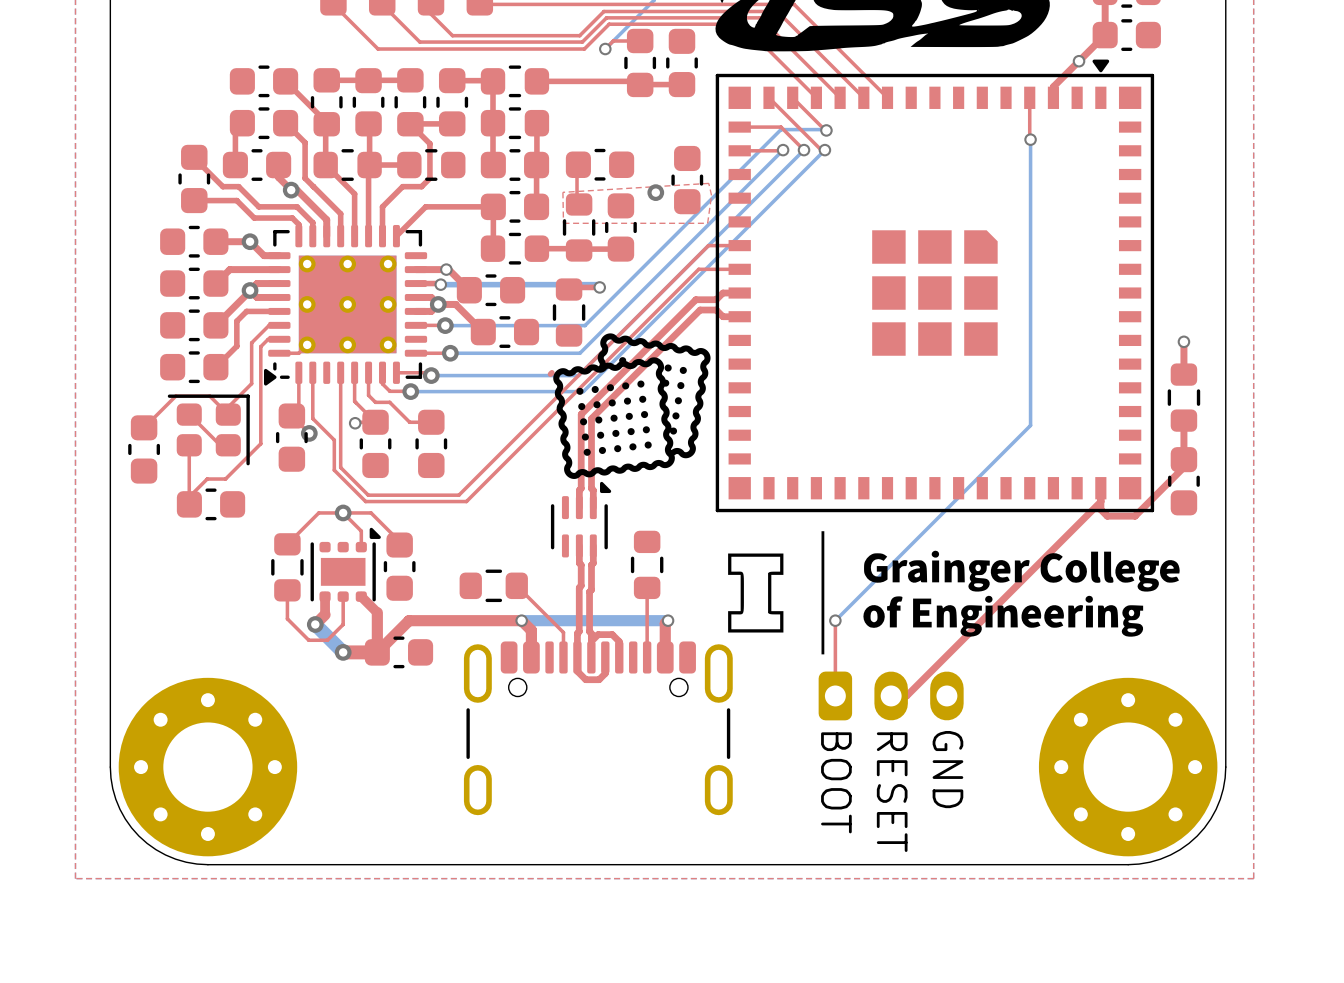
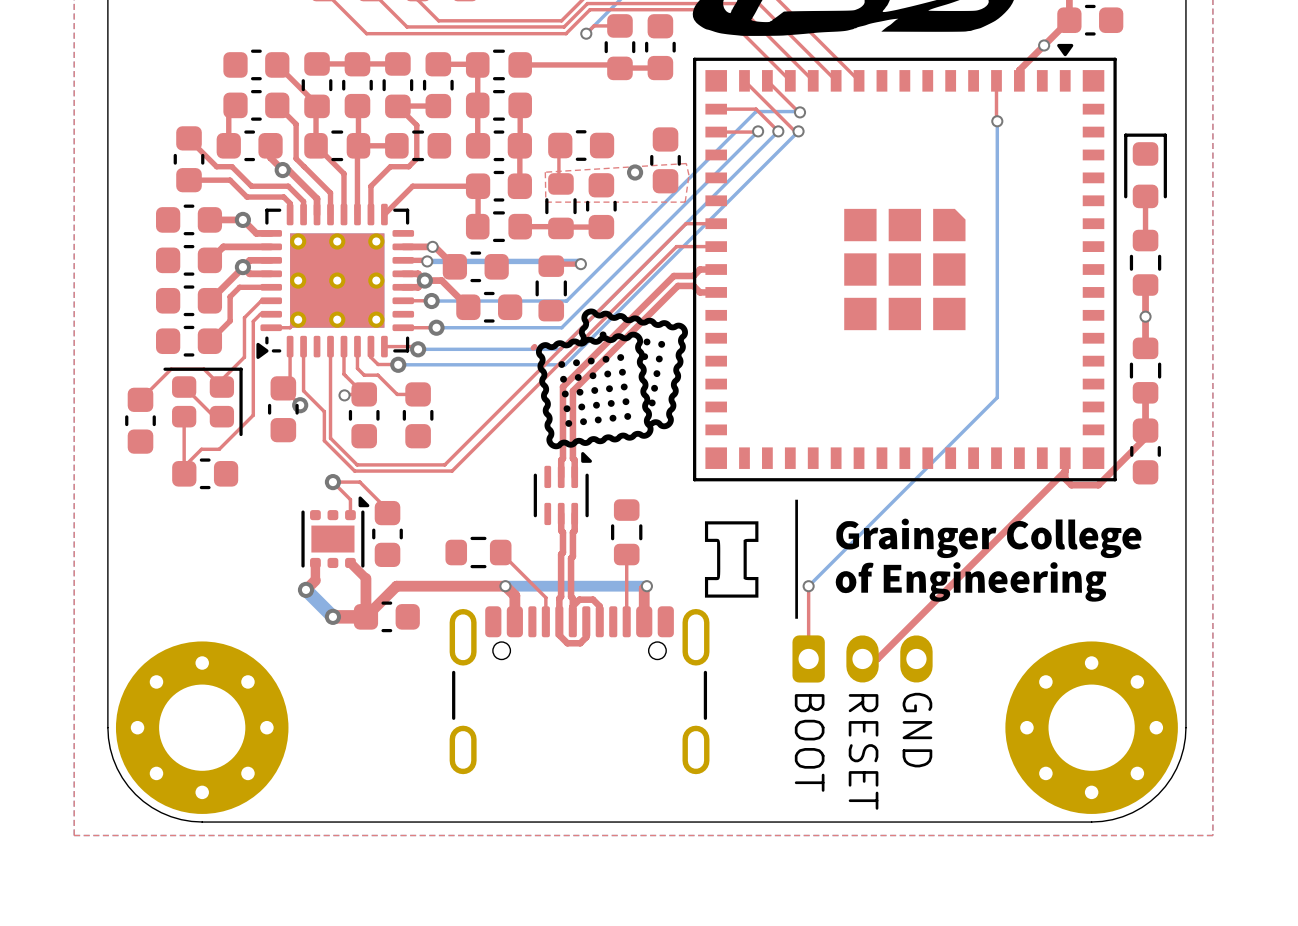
part: none -> (1145, 170)
top track: none -> (1145, 196) (1145, 240)
part: none -> (1145, 262)
top track: none -> (1145, 285) (1145, 316)
top track: (343, 512) (318, 512) (287, 544) -> none
part: (287, 567) -> none
top track: (287, 590) (287, 618) (308, 640) (327, 640) (343, 624) (343, 596) -> none

